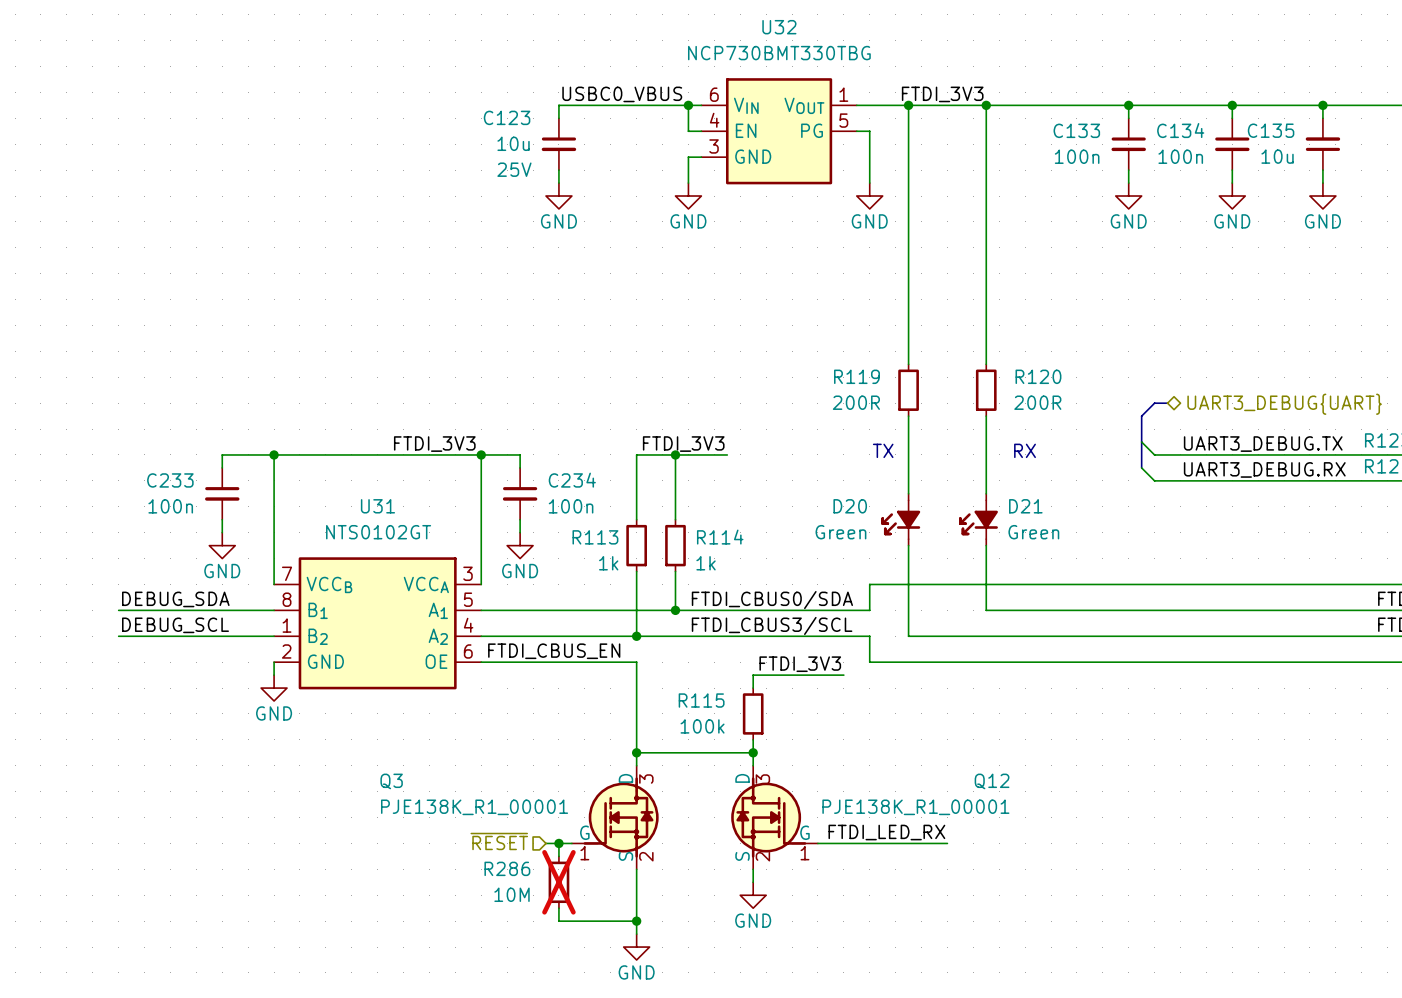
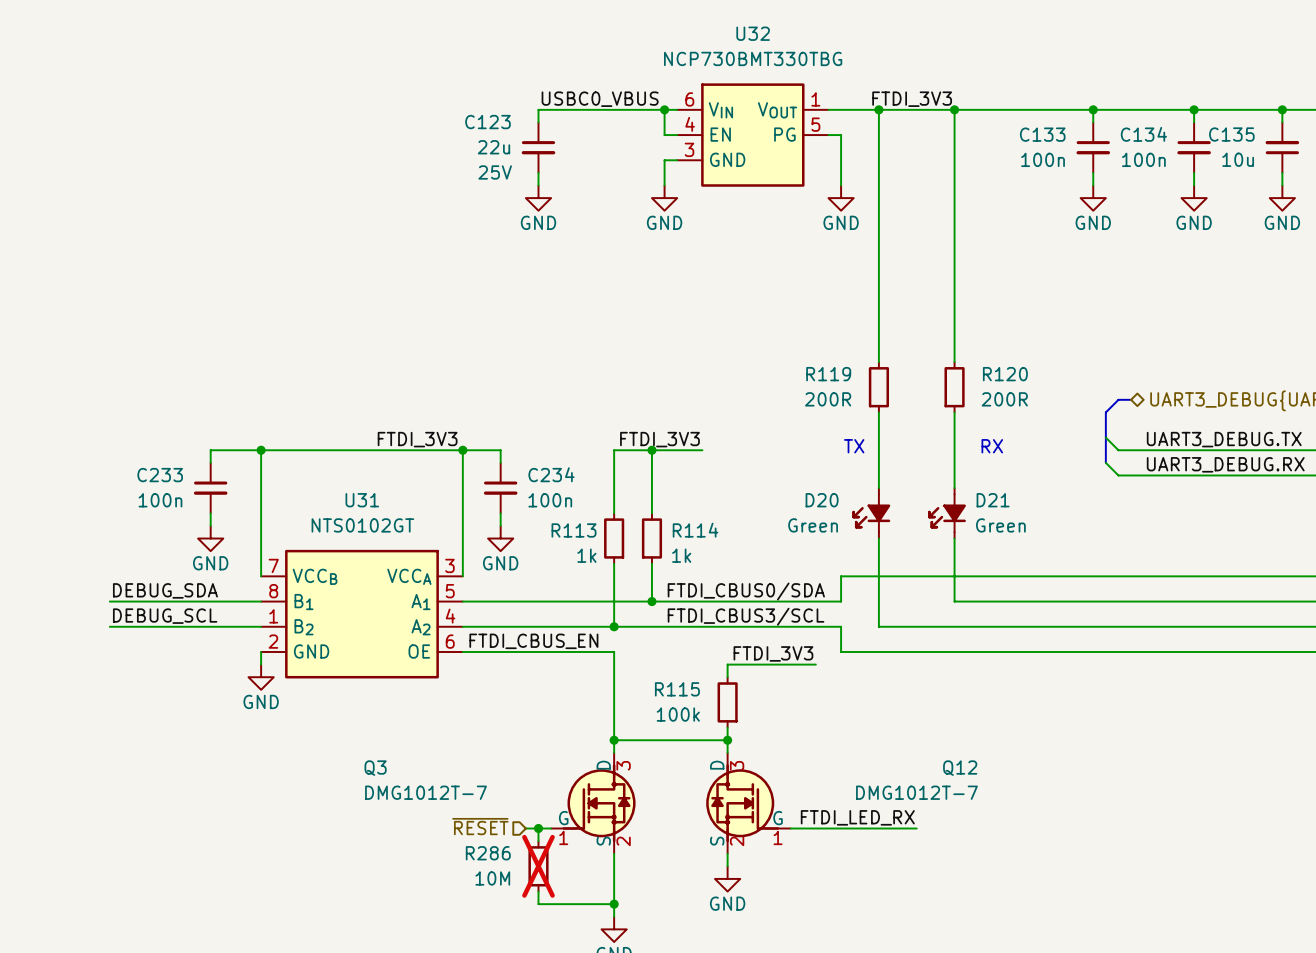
C123 text: 10u (513, 143) -> 22u (493, 147)
Q3 text: PJE138K_R1_00001 (474, 807) -> DMG1012T-7 (426, 792)
Q12 text: PJE138K_R1_00001 (915, 807) -> DMG1012T-7 (916, 792)

